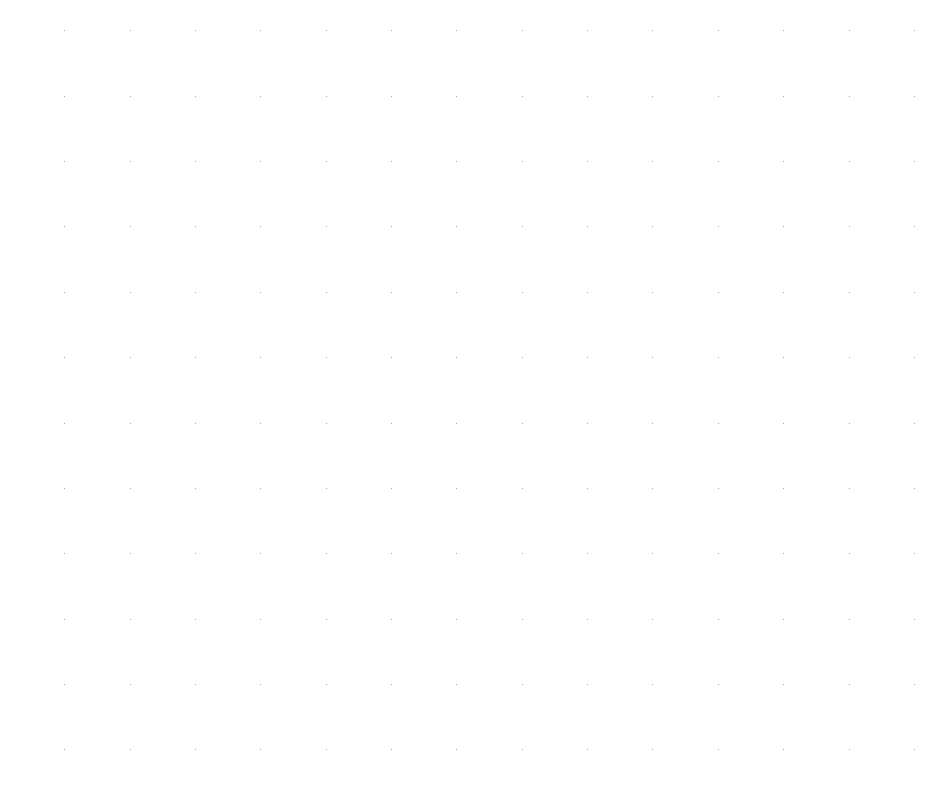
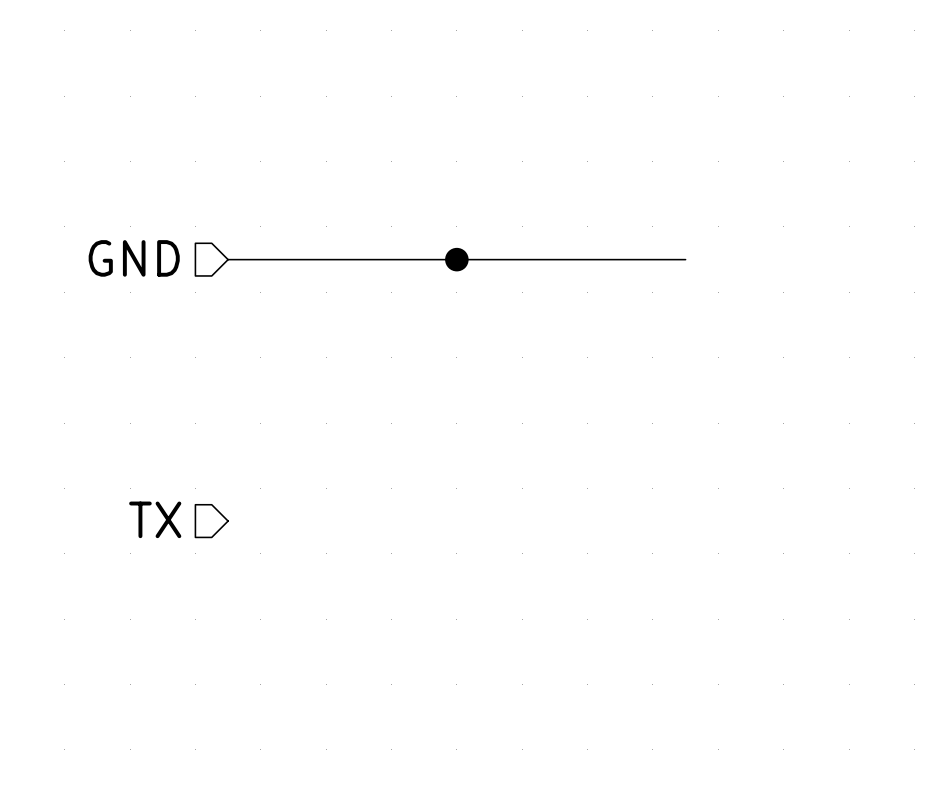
hierarchical label: none -> GND (134, 258)
wire: none -> (228, 259) (685, 259)
junction: none -> (456, 259)
hierarchical label: none -> TX (155, 519)

